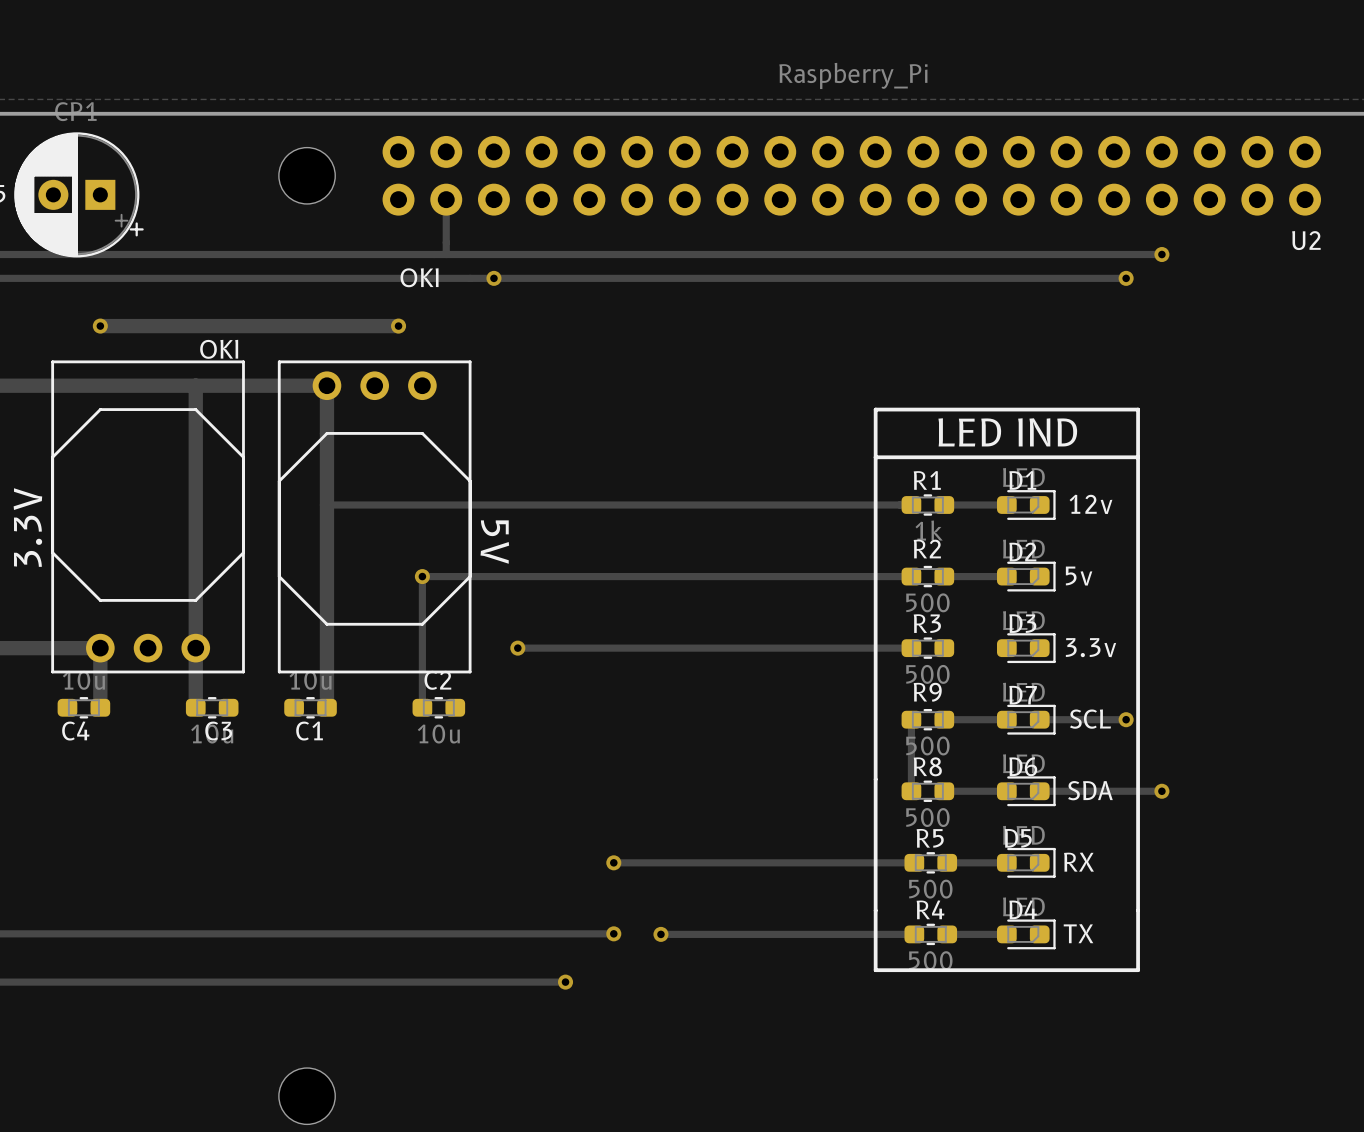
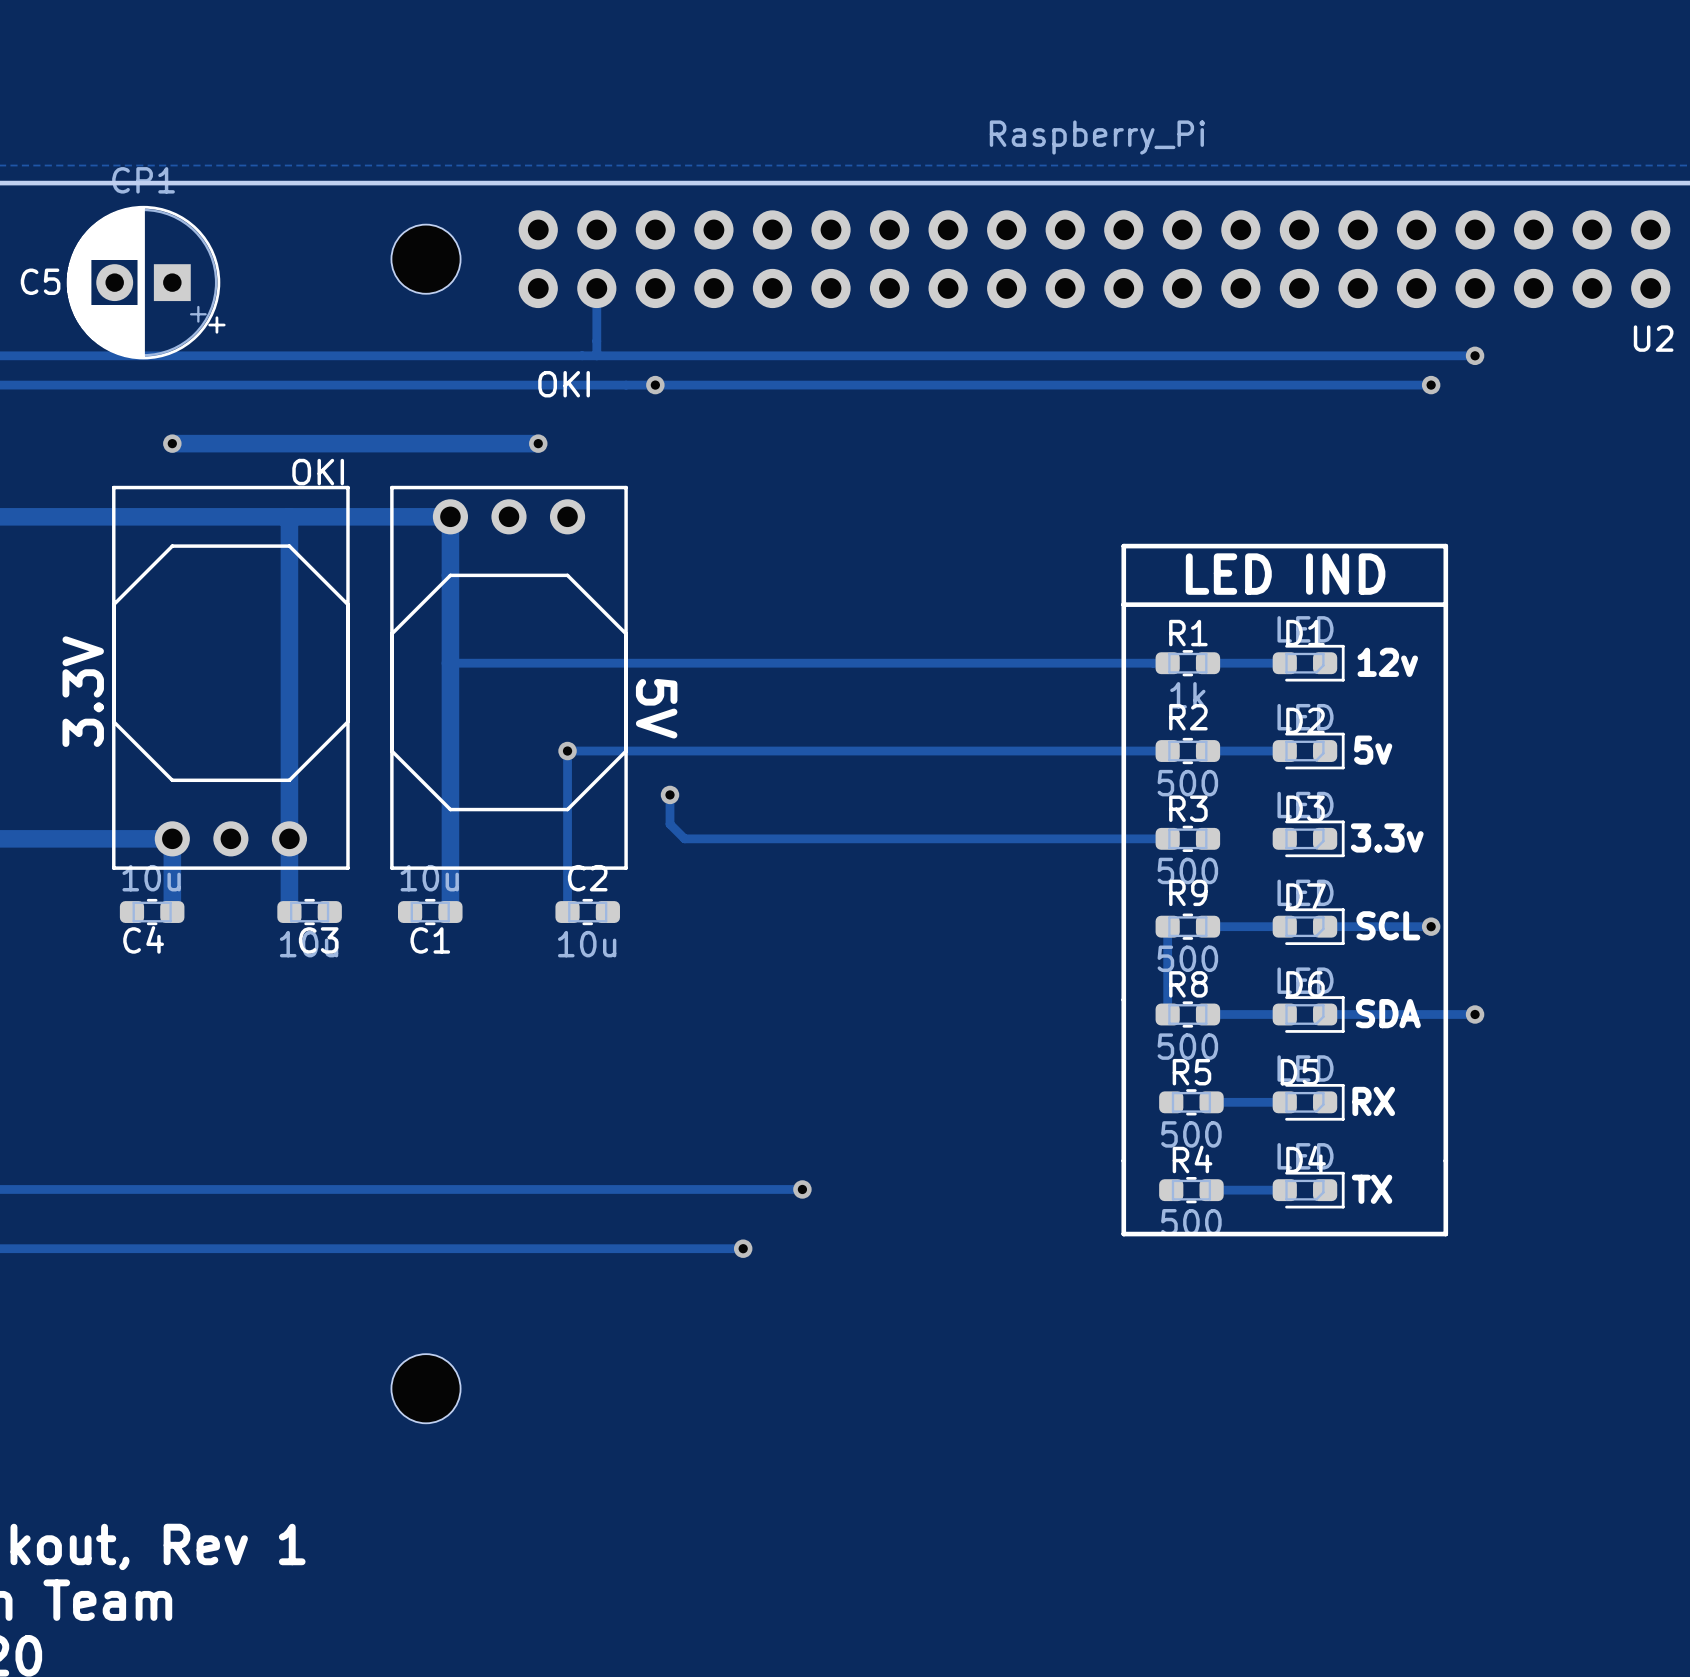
track: none -> (670, 794) (670, 824) (684, 838)
via position: (517, 648) -> (670, 794)
track: (613, 862) (914, 862) -> none
via: (613, 862) -> none
track: (660, 934) (914, 934) -> none
via: (660, 934) -> none

